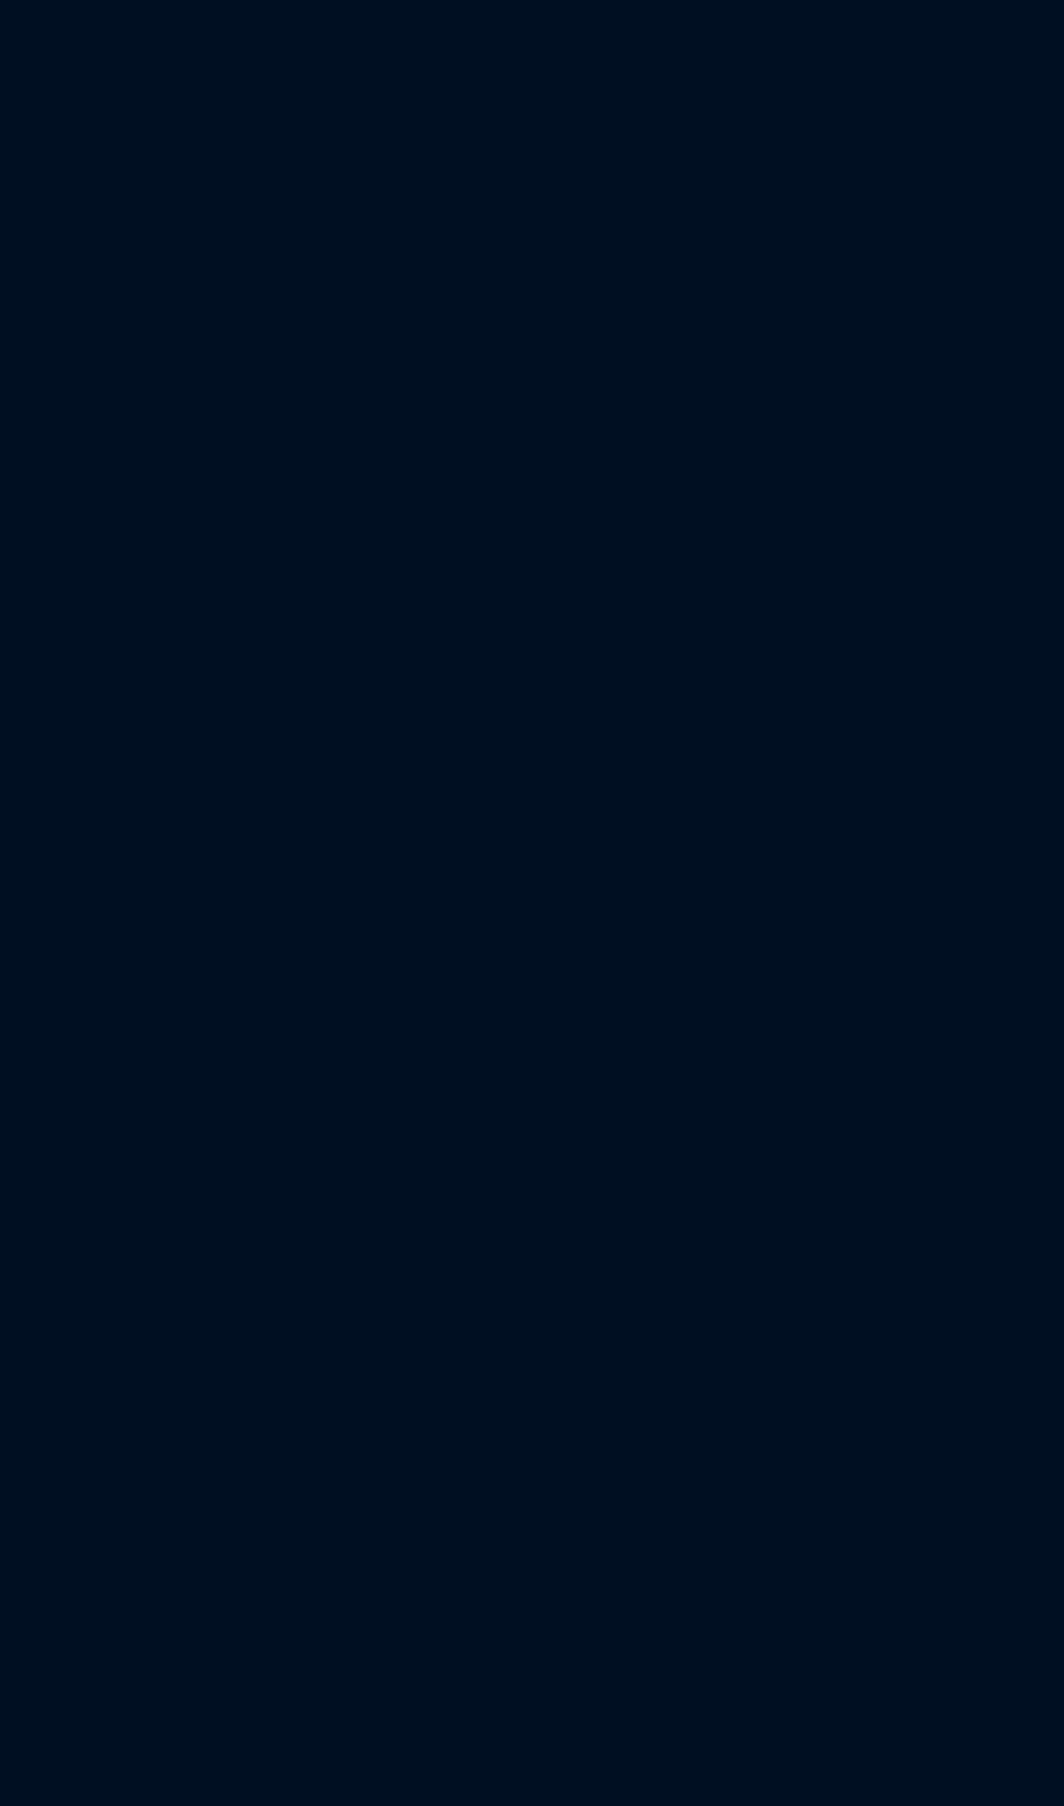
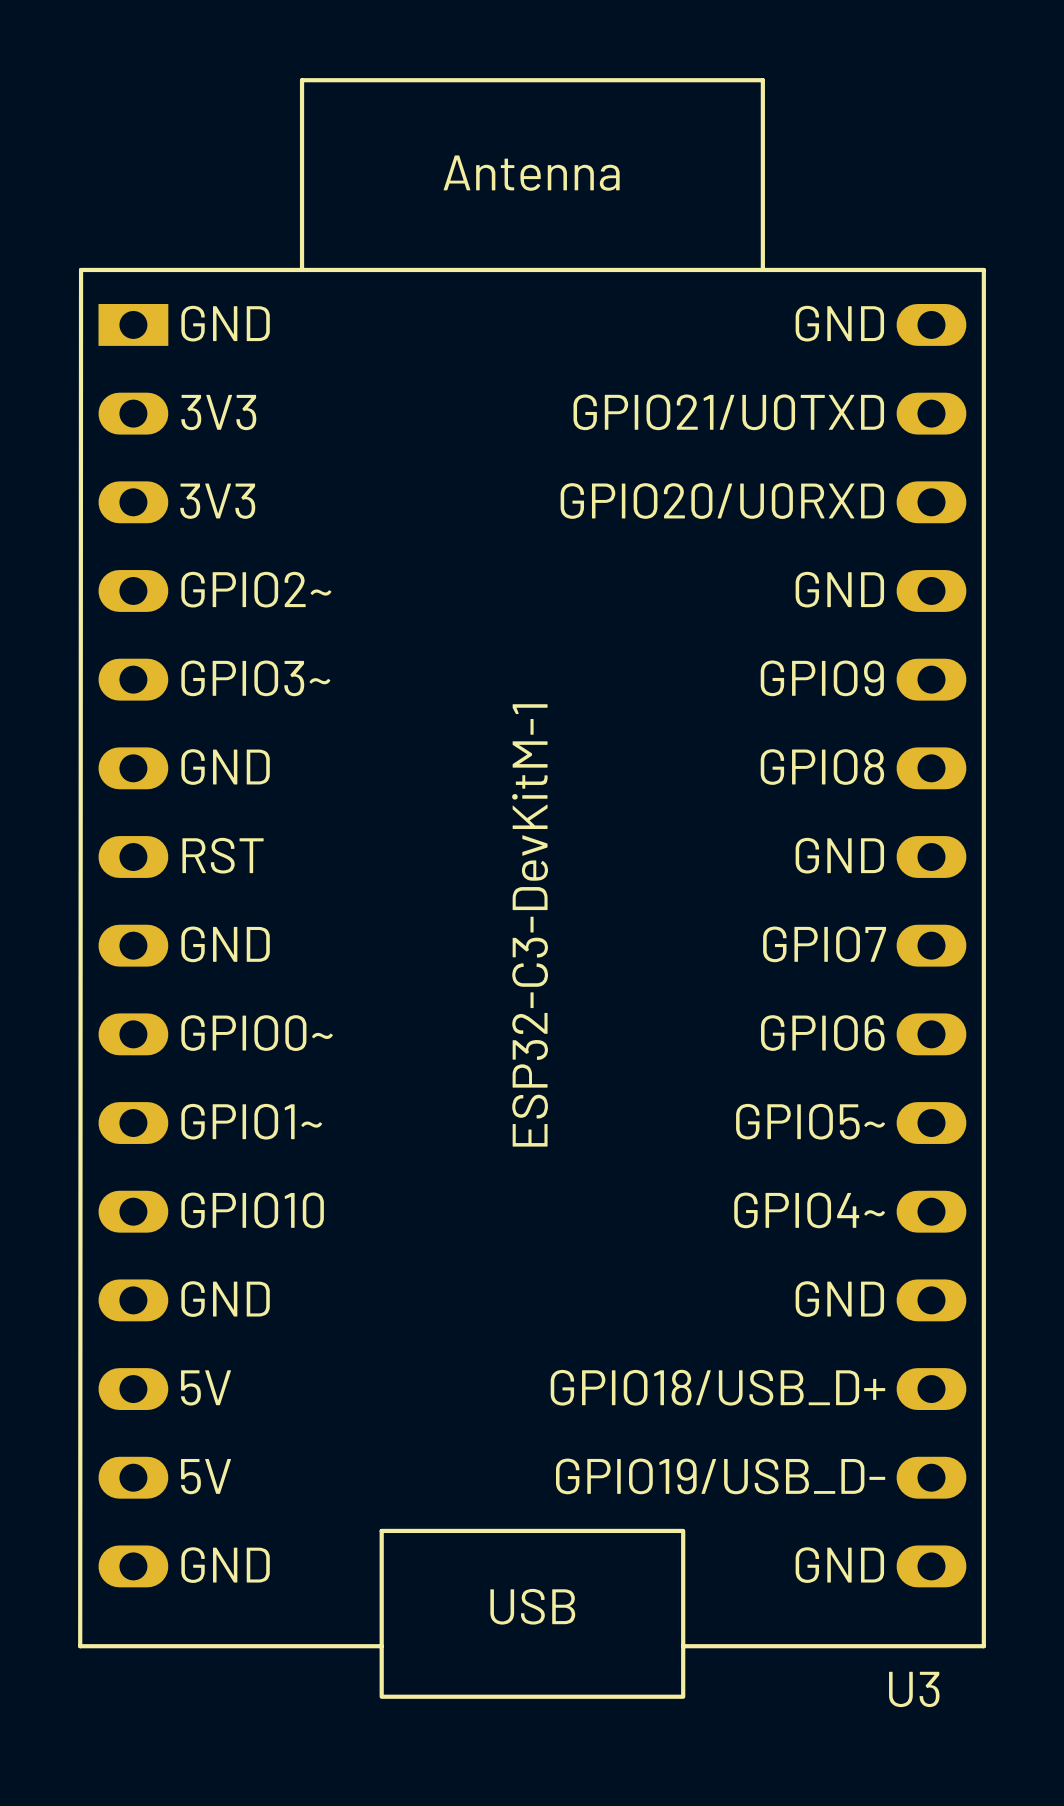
U3: none -> ESP32-C3-DevKitM-1 (532, 888)

